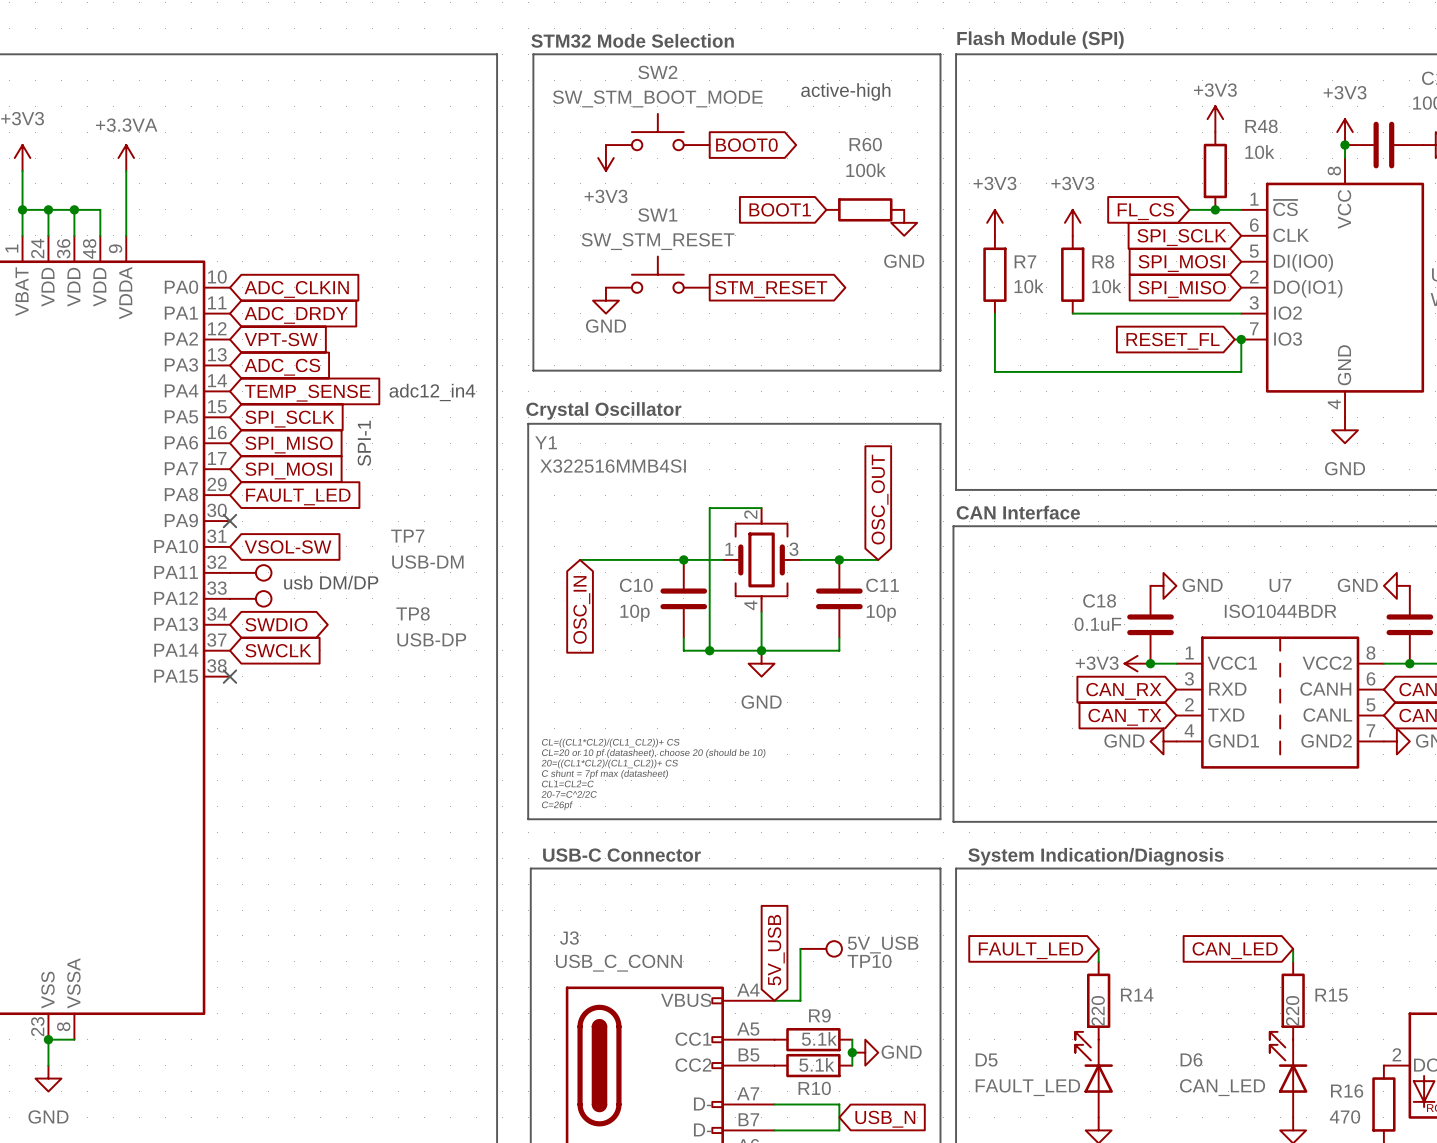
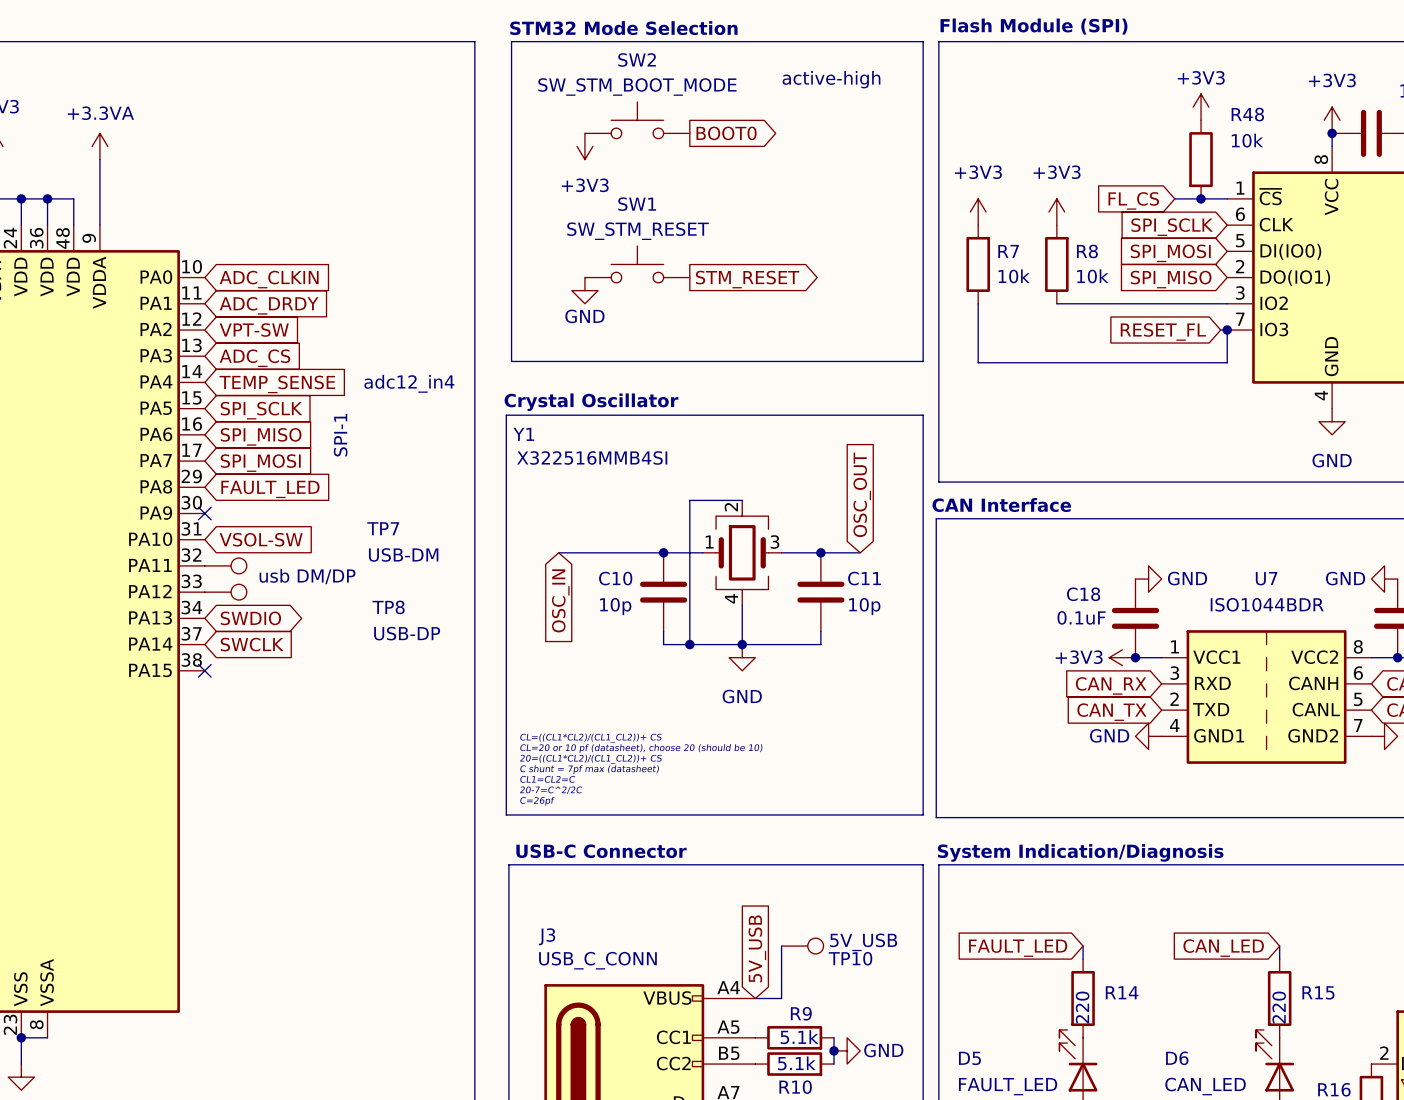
global label: BOOT1 (780, 209) -> none
R60: 100k (865, 209) -> none
power symbol: GND (904, 222) -> none

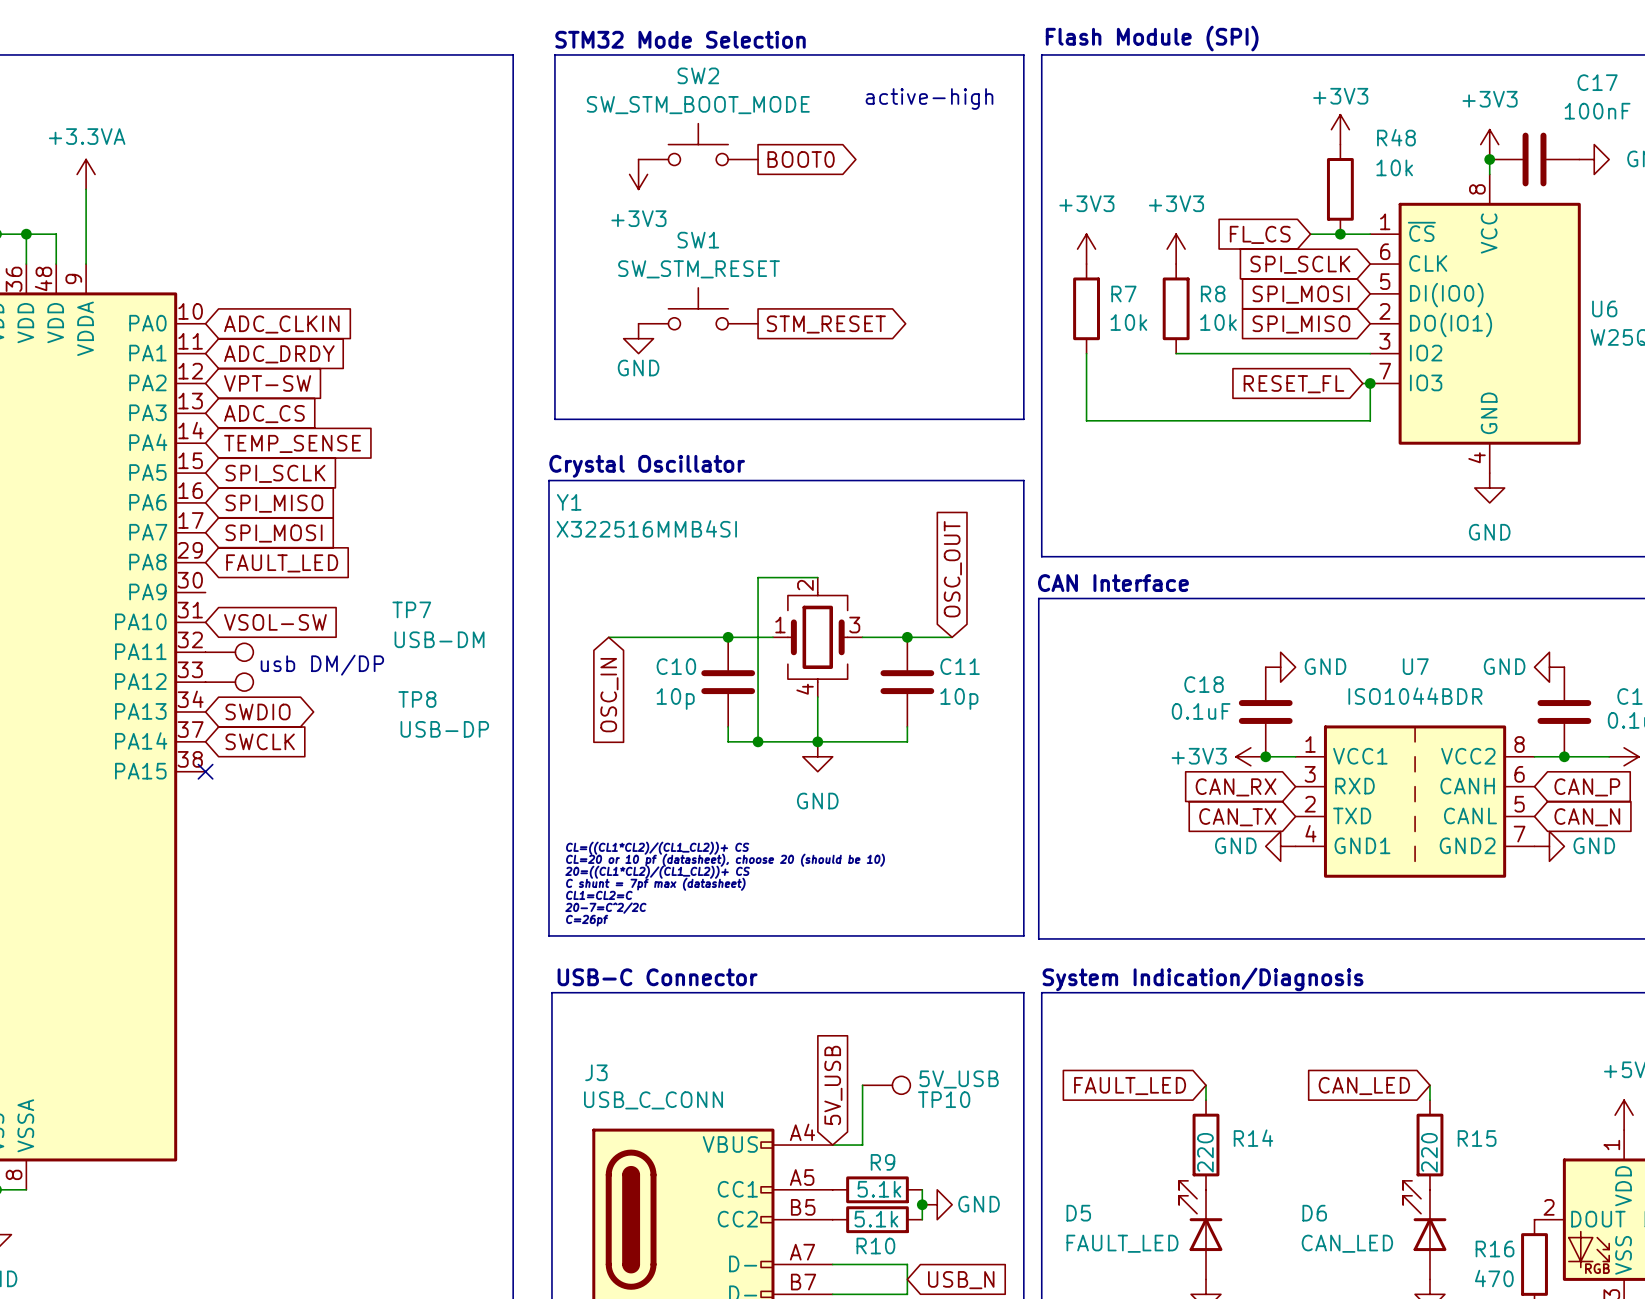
text: adc12_in4 (409, 383) -> none
text: SPI-1 (340, 435) -> none
no-connect mark: (204, 513) -> none

